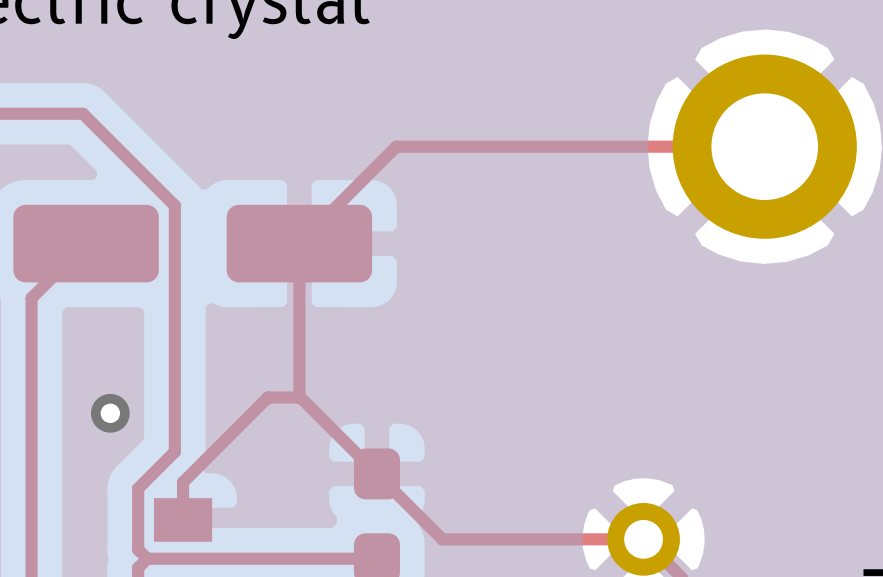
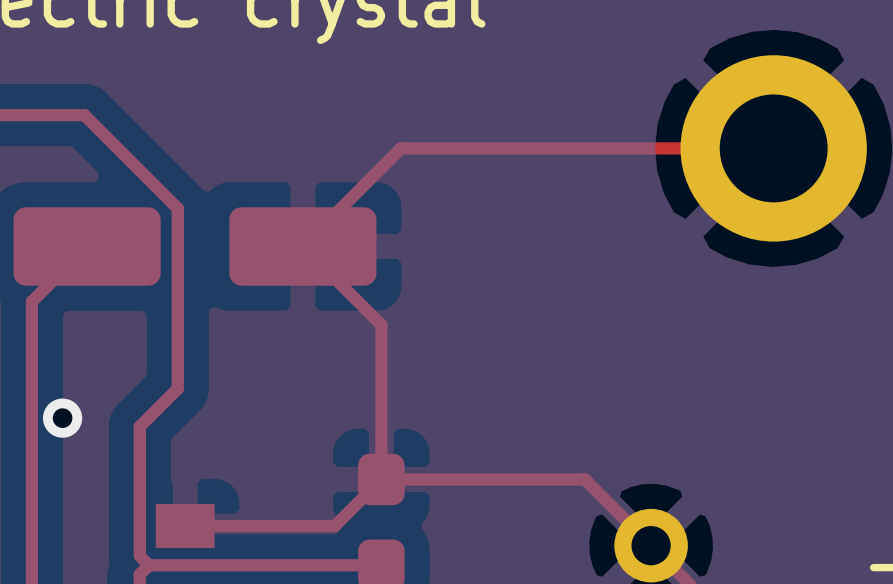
top track: (82, 113) (174, 205) (174, 451) (138, 488) -> (84, 115) (177, 208) (177, 388) (139, 426) (139, 494)
top track: (299, 243) (299, 397) -> (302, 246) (381, 324) (381, 479)
via position: (110, 413) -> (62, 418)
top track: none -> (381, 479) (334, 526) (185, 526)
top track: (183, 519) (183, 482) (267, 397) (300, 397) (442, 539) (643, 539) -> (381, 479) (584, 479) (651, 545)

